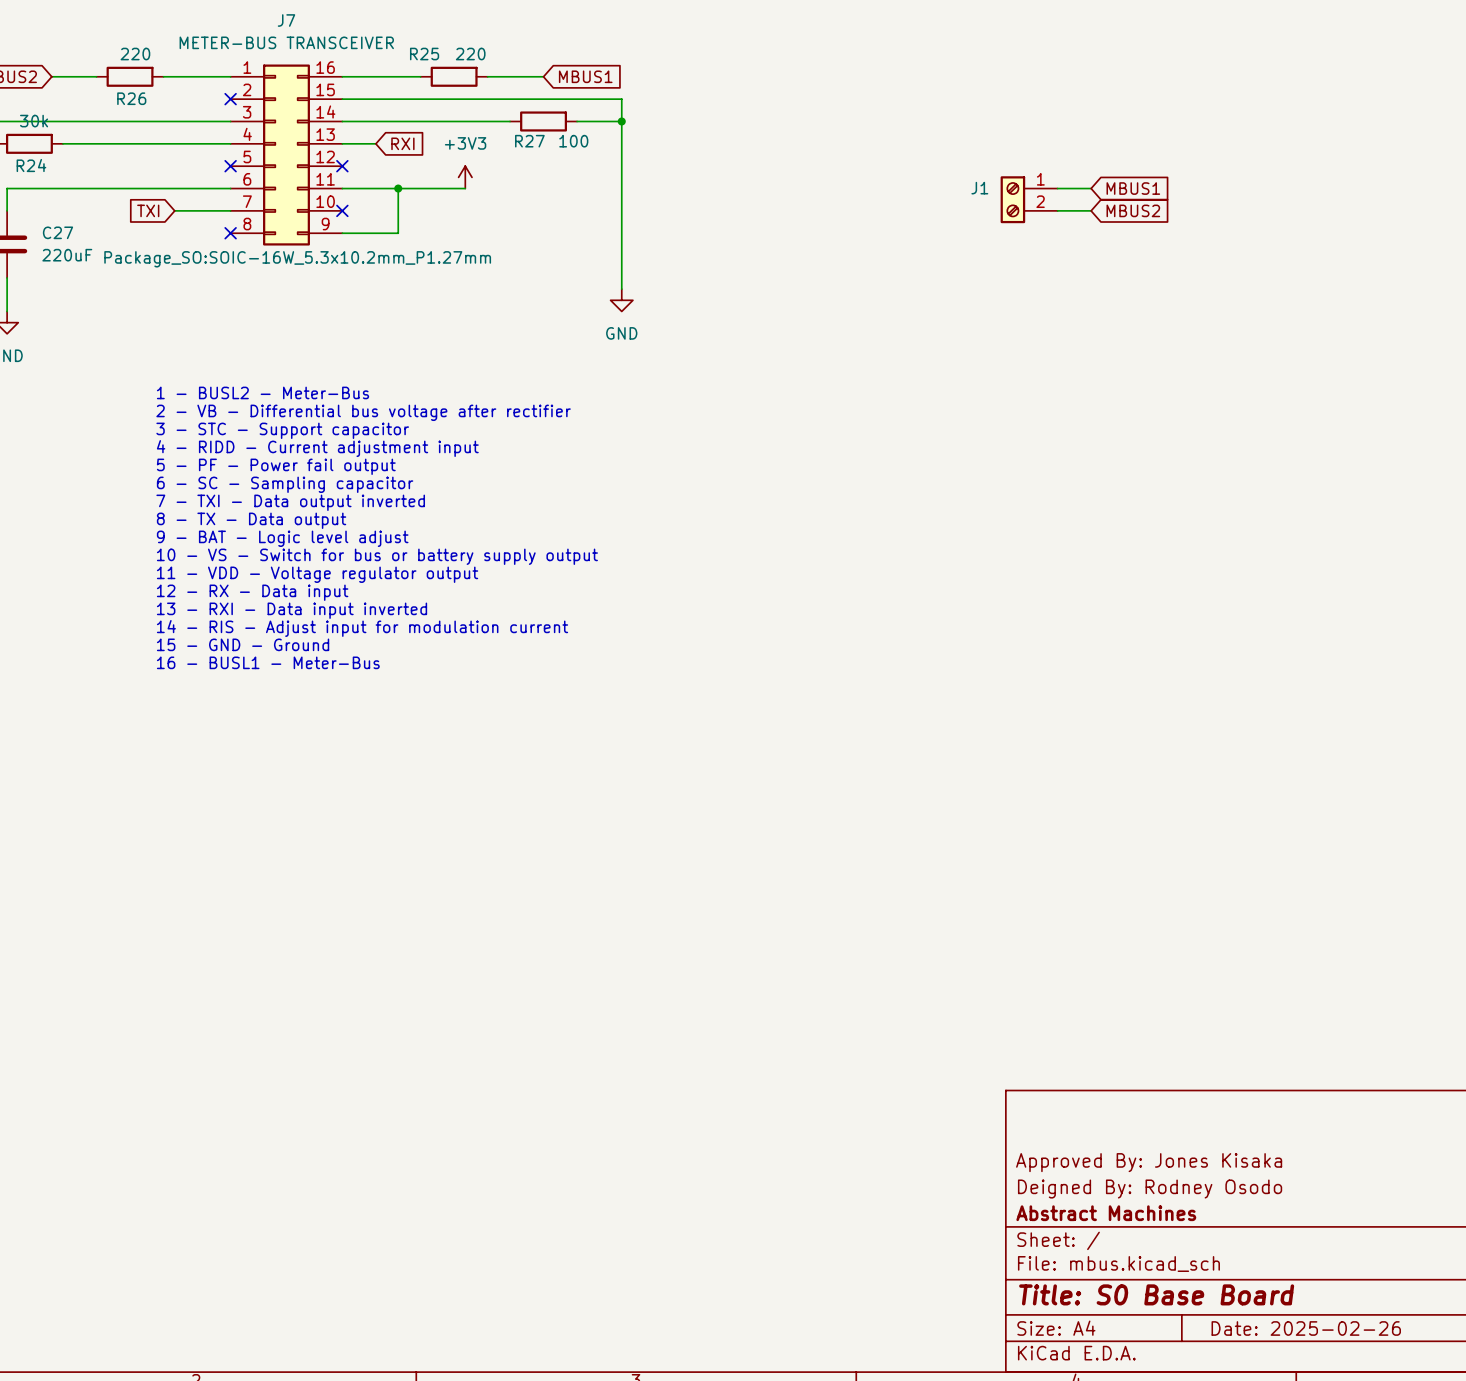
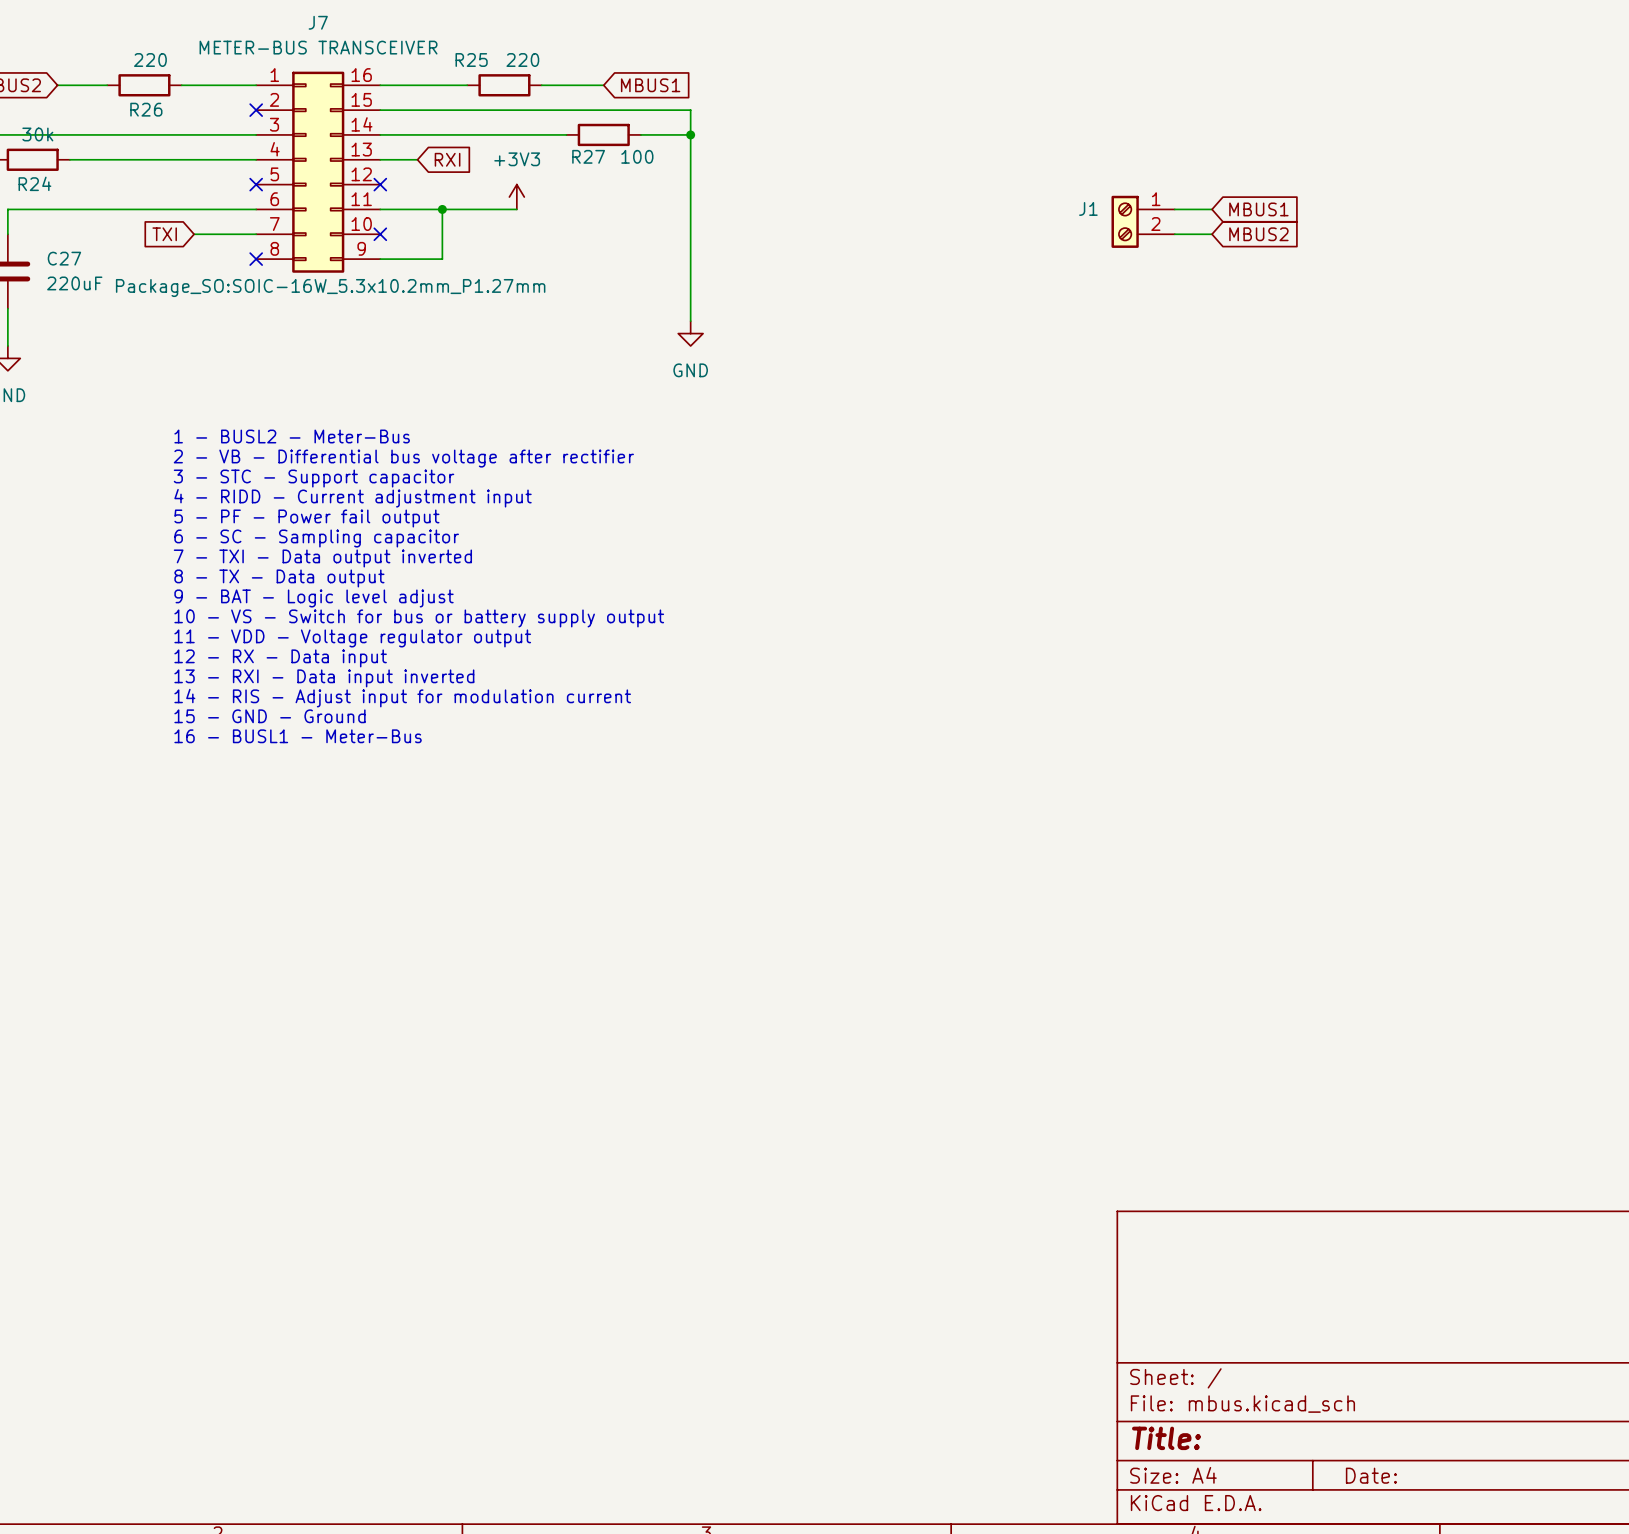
title block: Approved By: Jones Kisaka (1149, 1162) -> none
title block: Deigned By: Rodney Osodo (1150, 1189) -> none
title block: Abstract Machines (1106, 1213) -> none
title block: Title: S0 Base Board (1156, 1294) -> Title: (1166, 1438)
title block: Date: 2025-02-26 (1306, 1328) -> Date: (1371, 1475)

